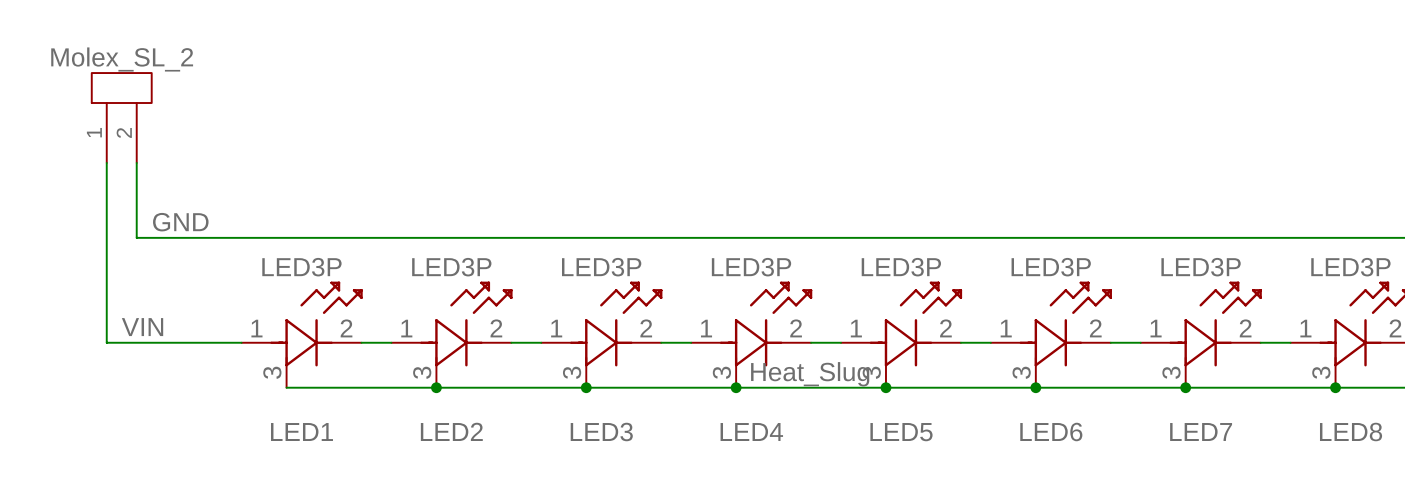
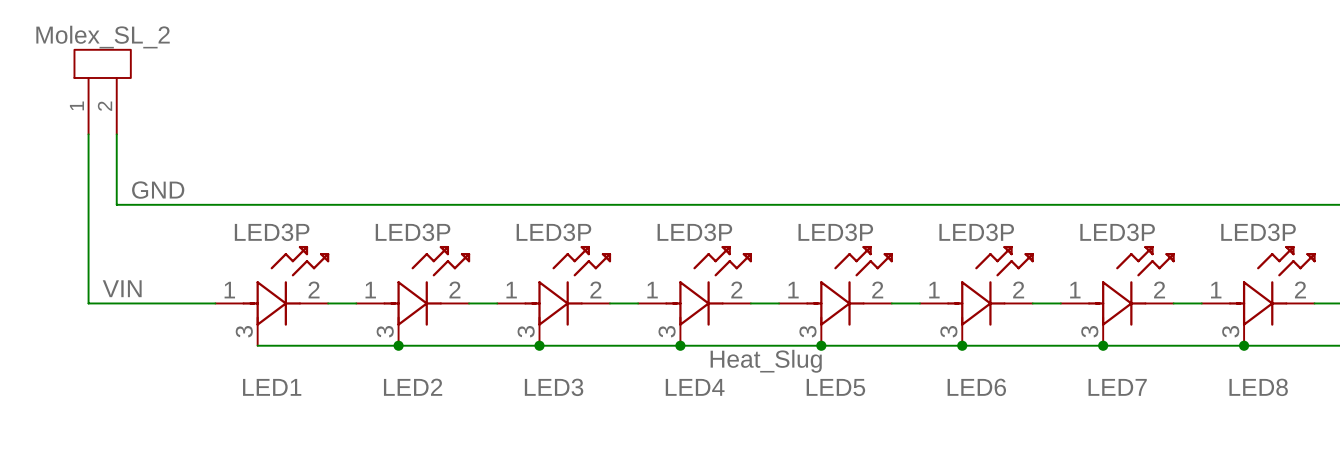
label position: Heat_Slug (810, 374) -> Heat_Slug (766, 361)

